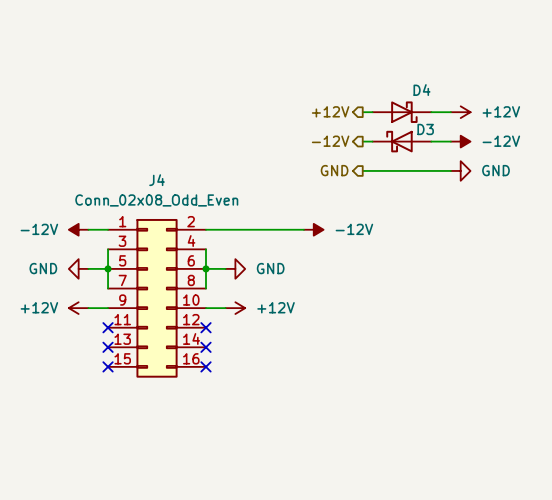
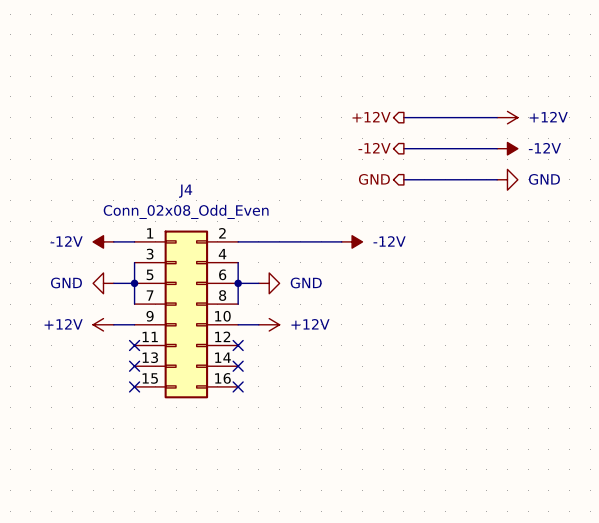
D4: (401, 112) -> none
D3: (401, 141) -> none

